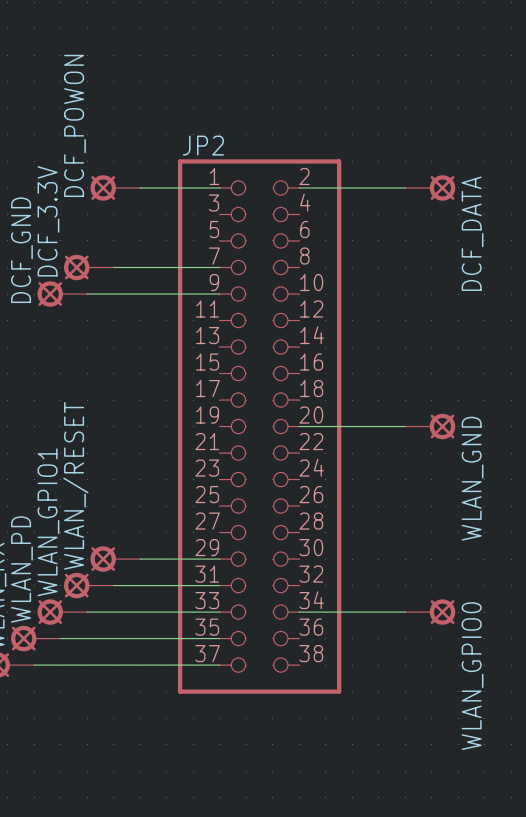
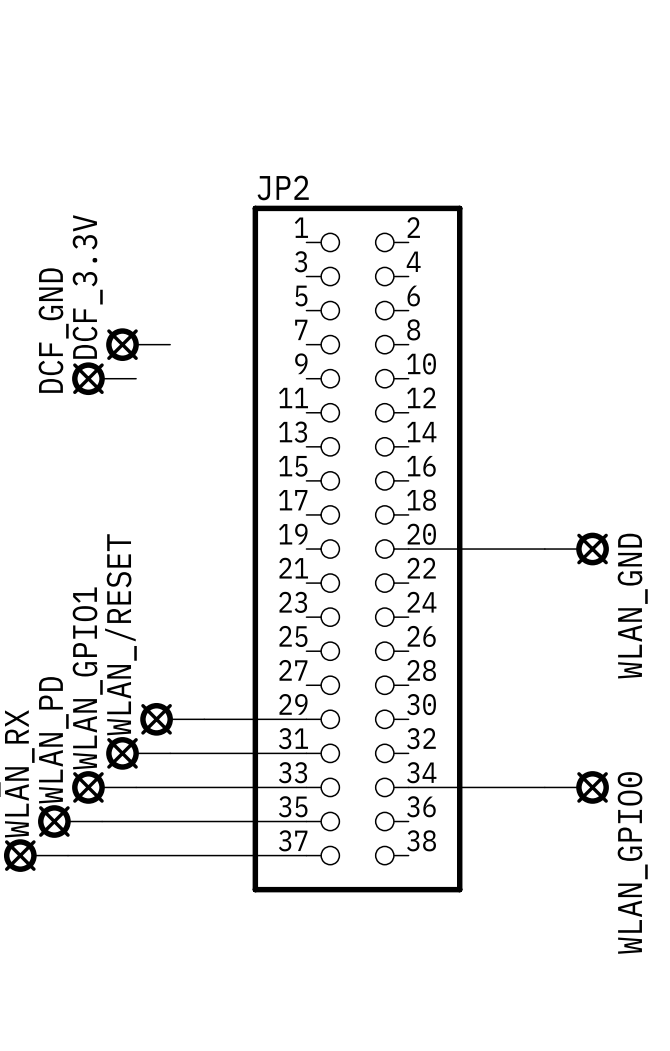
DCF_POWON: (115, 187) -> none
wire: (140, 187) (219, 187) -> none
wire: (299, 187) (405, 187) -> none
DCF_DATA: (430, 187) -> none
wire: (113, 267) (219, 267) -> none
wire: (87, 294) (219, 294) -> none

